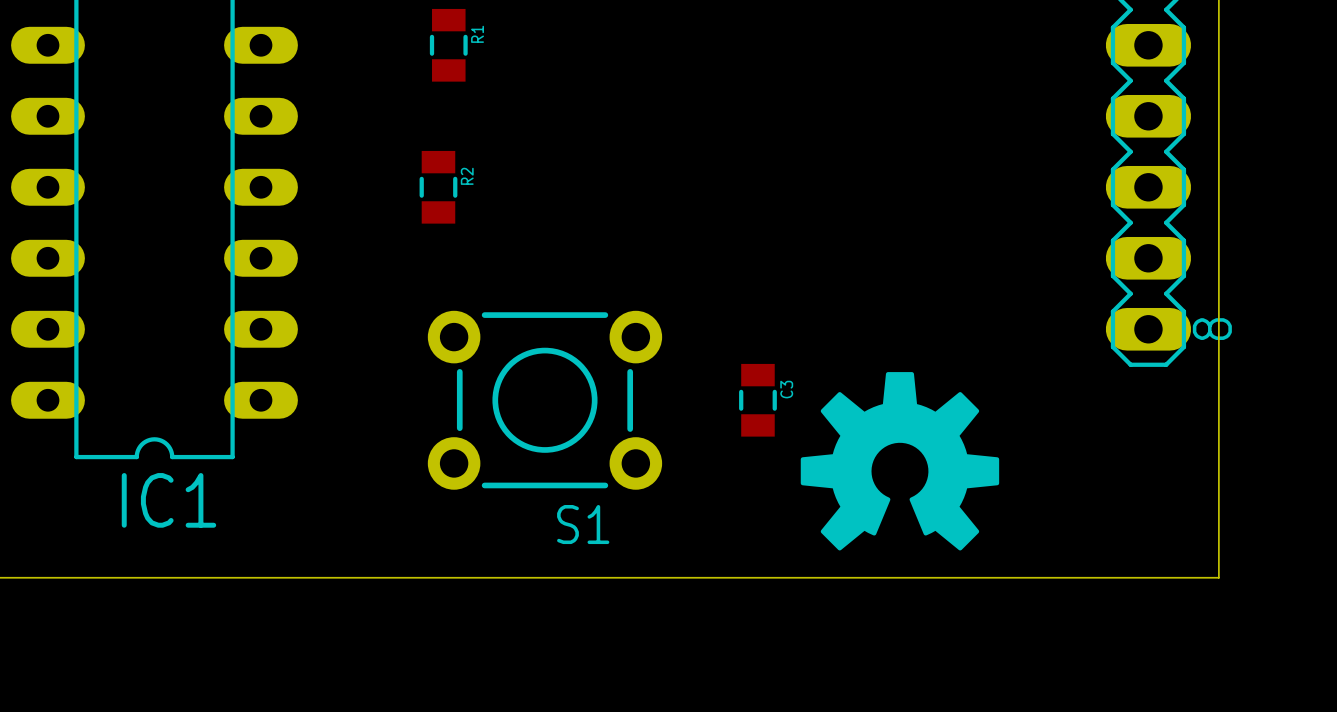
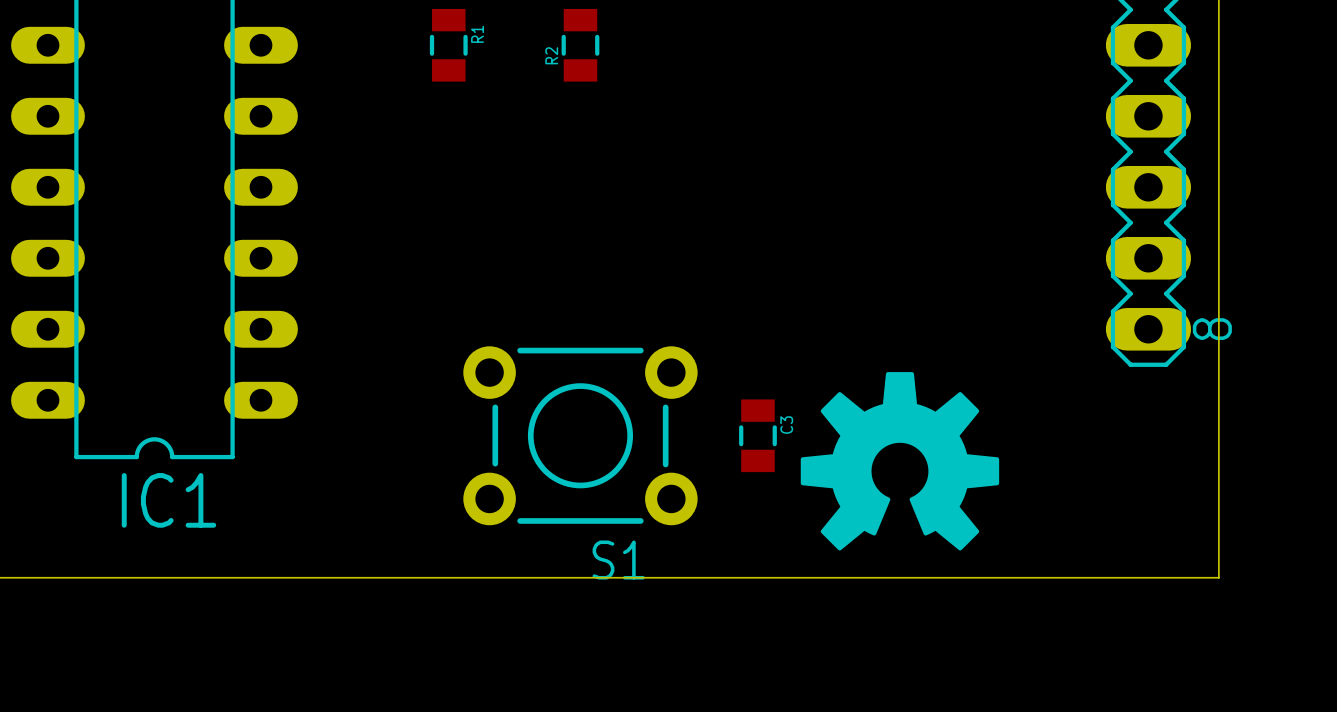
R2 name position: R2 (467, 176) -> R2 (551, 55)
R2 position: (438, 187) -> (580, 45)
S1 position: (544, 400) -> (580, 435)
C3 position: (757, 400) -> (757, 435)

